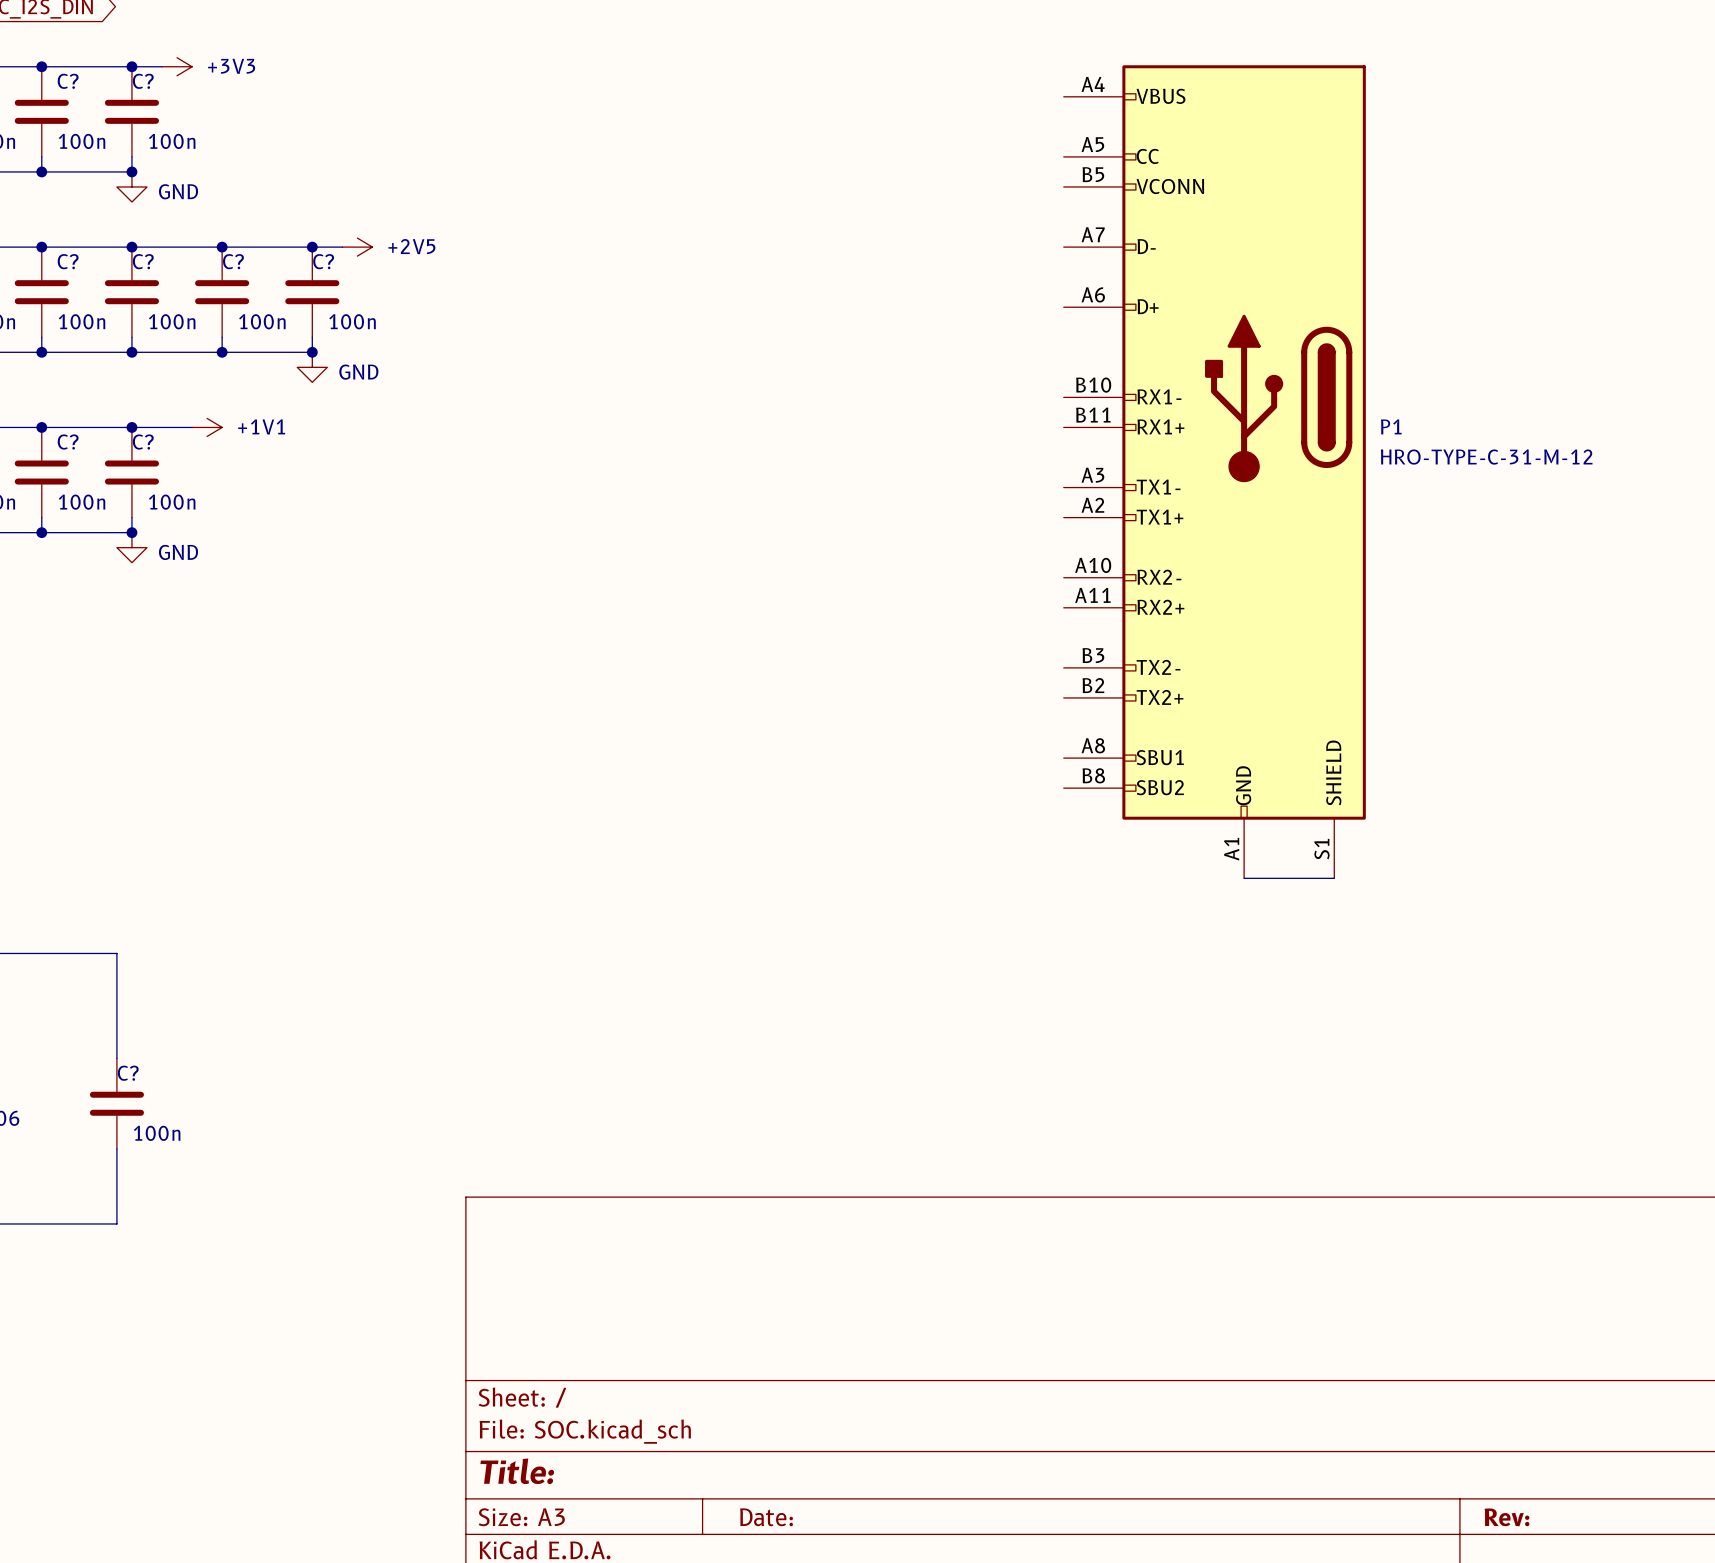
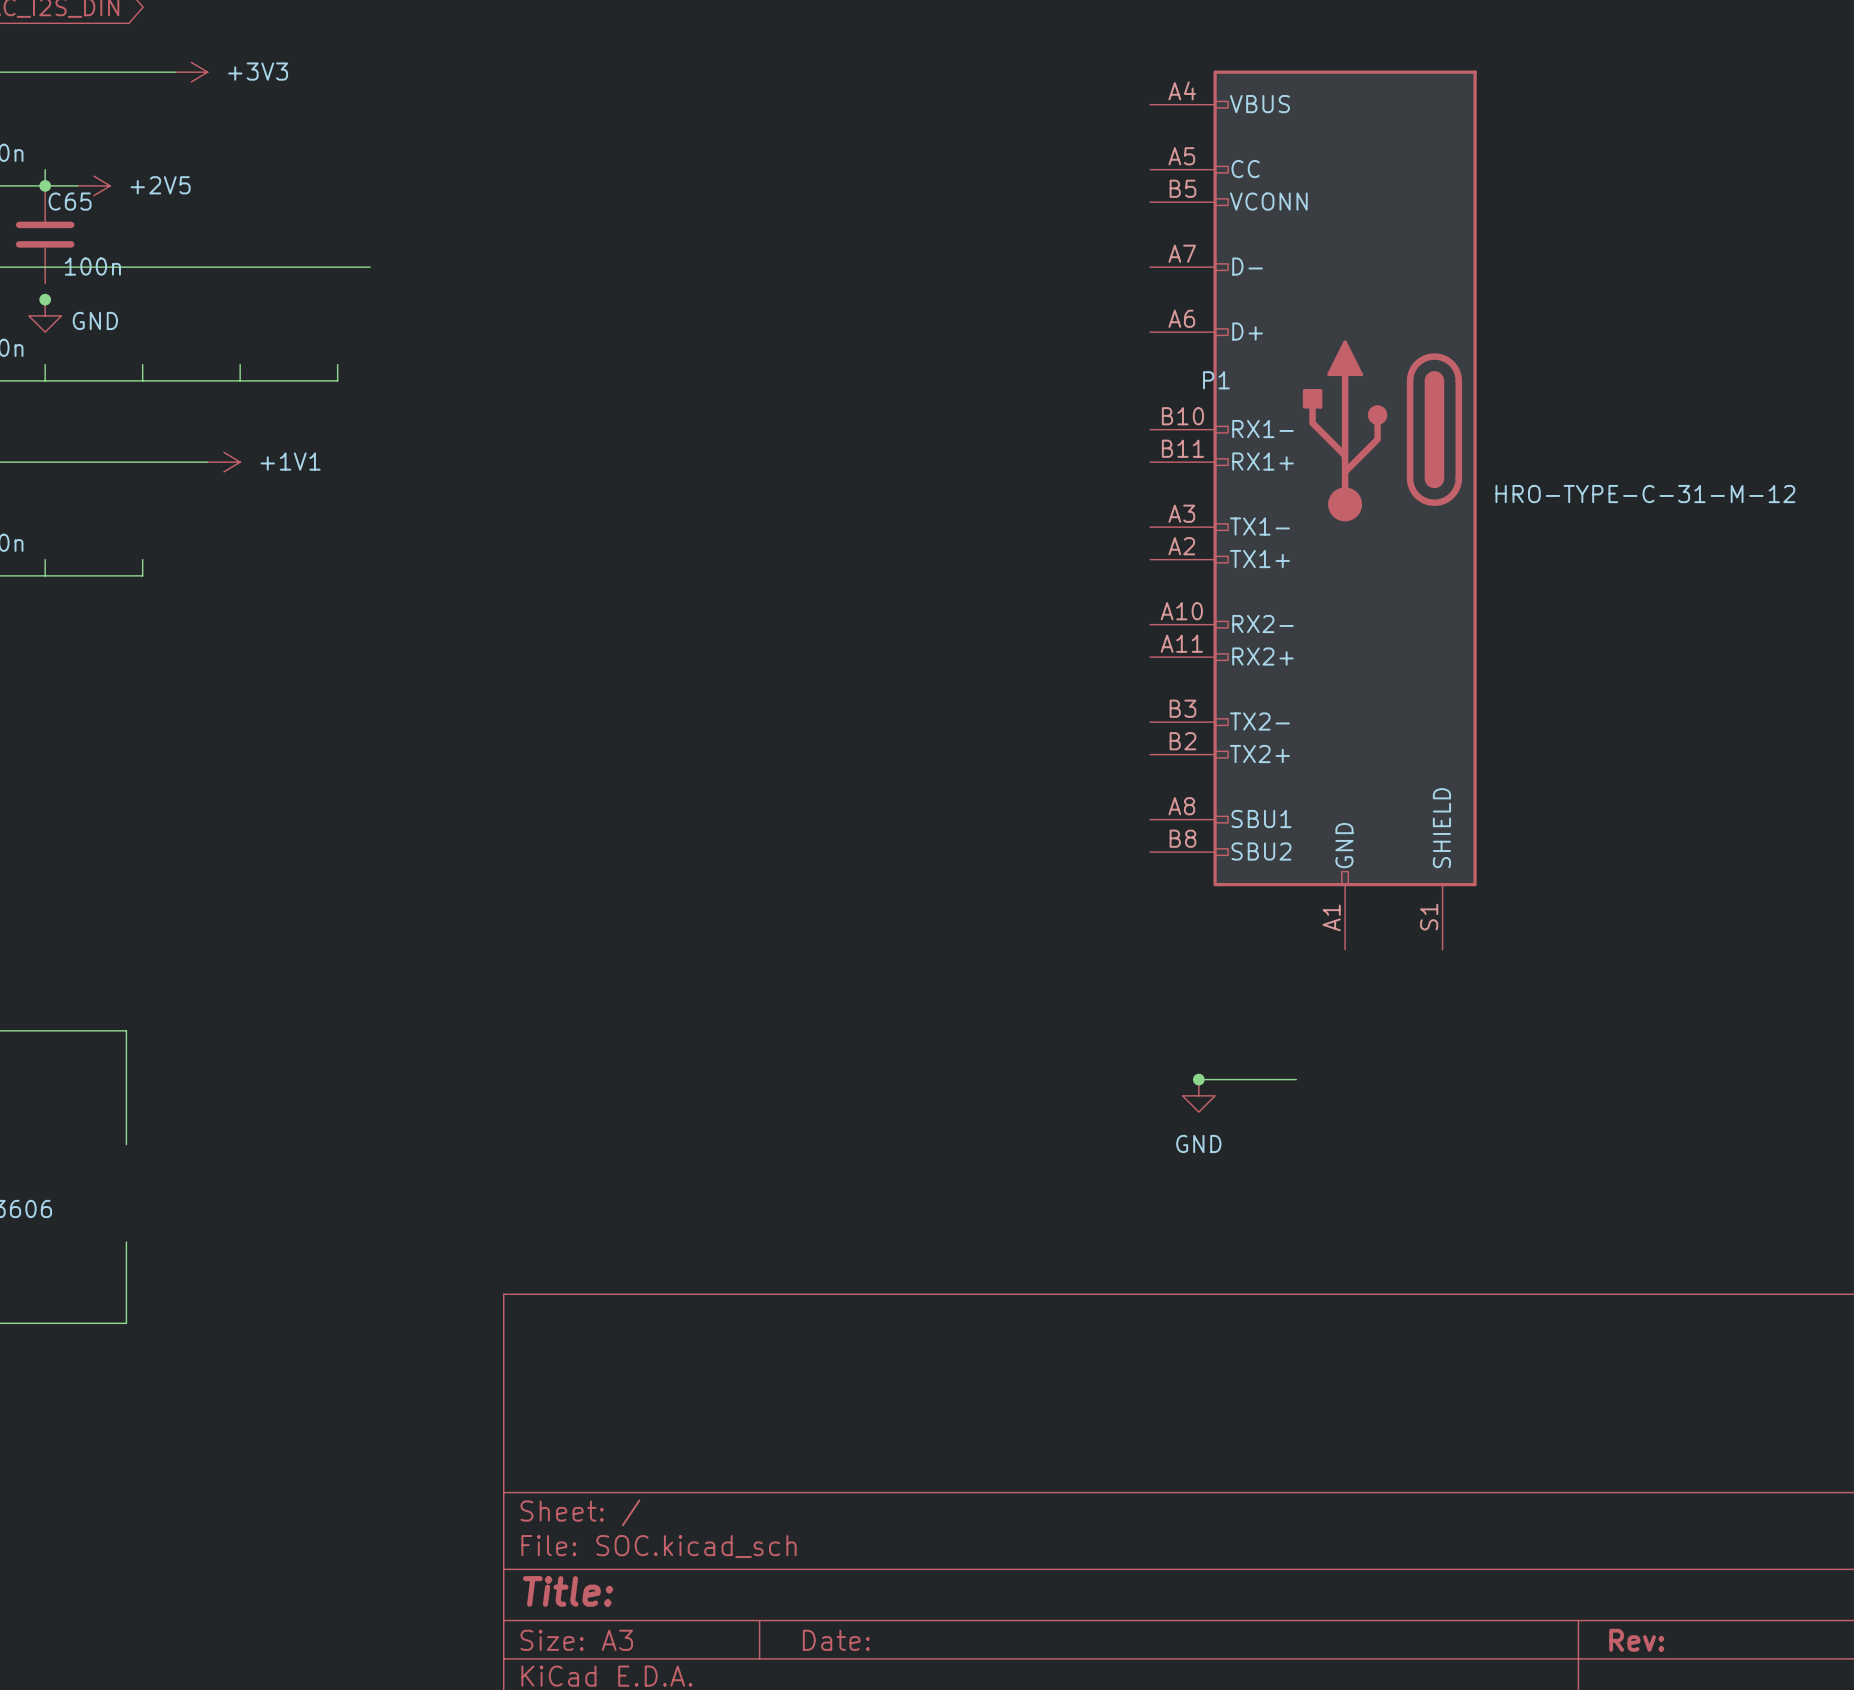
junction: (41, 66) -> none
junction: (131, 66) -> none
C?: 100n (41, 111) -> none
C?: 100n (131, 111) -> none
wire: (131, 156) (131, 171) (71, 171) -> none
junction: (131, 171) -> none
power symbol: GND (131, 186) -> none
C65: none -> 100n (45, 234)
junction position: (41, 247) -> (45, 299)
junction: (131, 247) -> none
junction: (222, 247) -> none
junction: (312, 247) -> none
power symbol position: +2V5 (357, 247) -> +2V5 (93, 185)
C?: 100n (41, 292) -> none
power symbol: none -> GND (45, 315)
C?: 100n (131, 292) -> none
C?: 100n (222, 292) -> none
C?: 100n (312, 292) -> none
junction: (41, 352) -> none
junction: (131, 352) -> none
junction: (222, 352) -> none
junction: (312, 352) -> none
power symbol: GND (312, 367) -> none
P1 name position: P1 (1391, 426) -> P1 (1216, 380)
junction: (41, 427) -> none
junction: (131, 427) -> none
C?: 100n (41, 472) -> none
C?: 100n (131, 472) -> none
junction: (41, 532) -> none
junction: (131, 532) -> none
power symbol: GND (131, 547) -> none
wire: (1244, 878) (1334, 878) -> (1198, 1079) (1296, 1079)
junction: none -> (1198, 1079)
power symbol: none -> GND (1198, 1095)
C?: 100n (116, 1103) -> none

